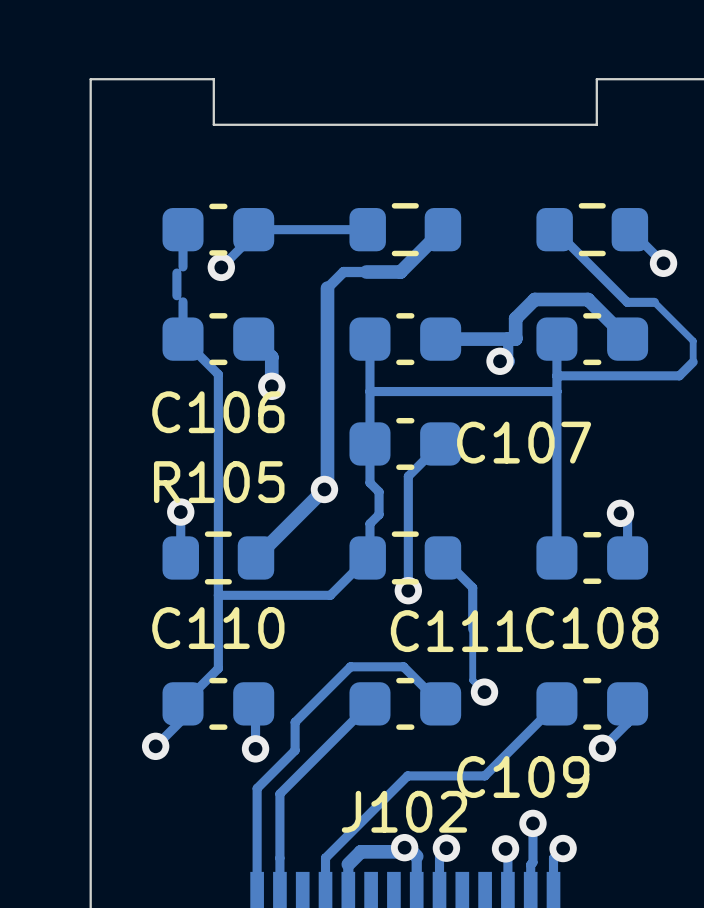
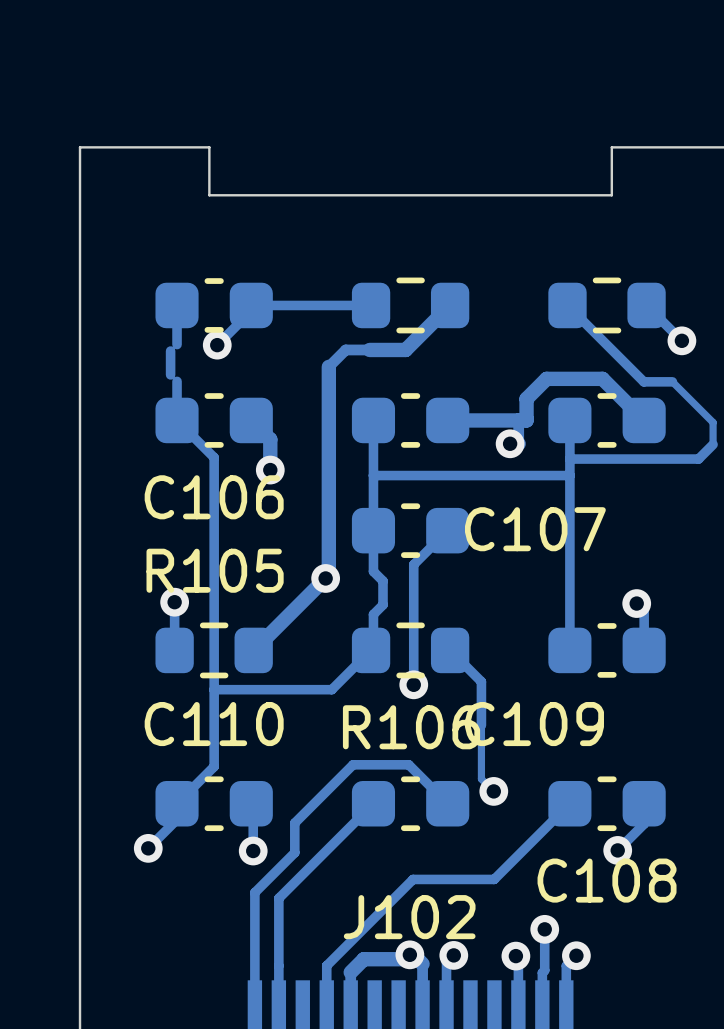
C108 name position: C108 (592, 628) -> C108 (607, 880)
R106 name: none -> R106 (411, 727)
C111 name: C111 (456, 631) -> none
C109 name position: C109 (523, 776) -> C109 (534, 724)

